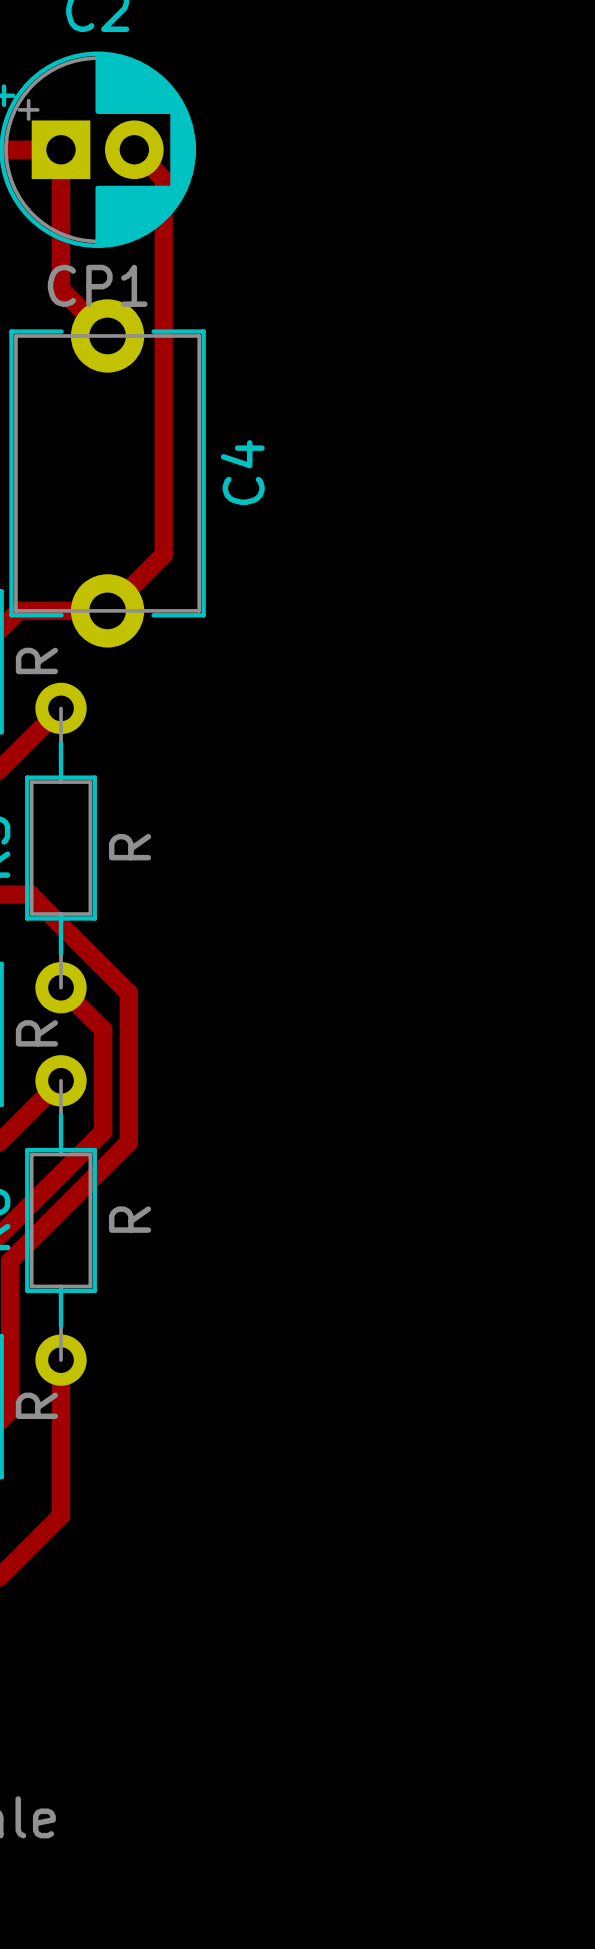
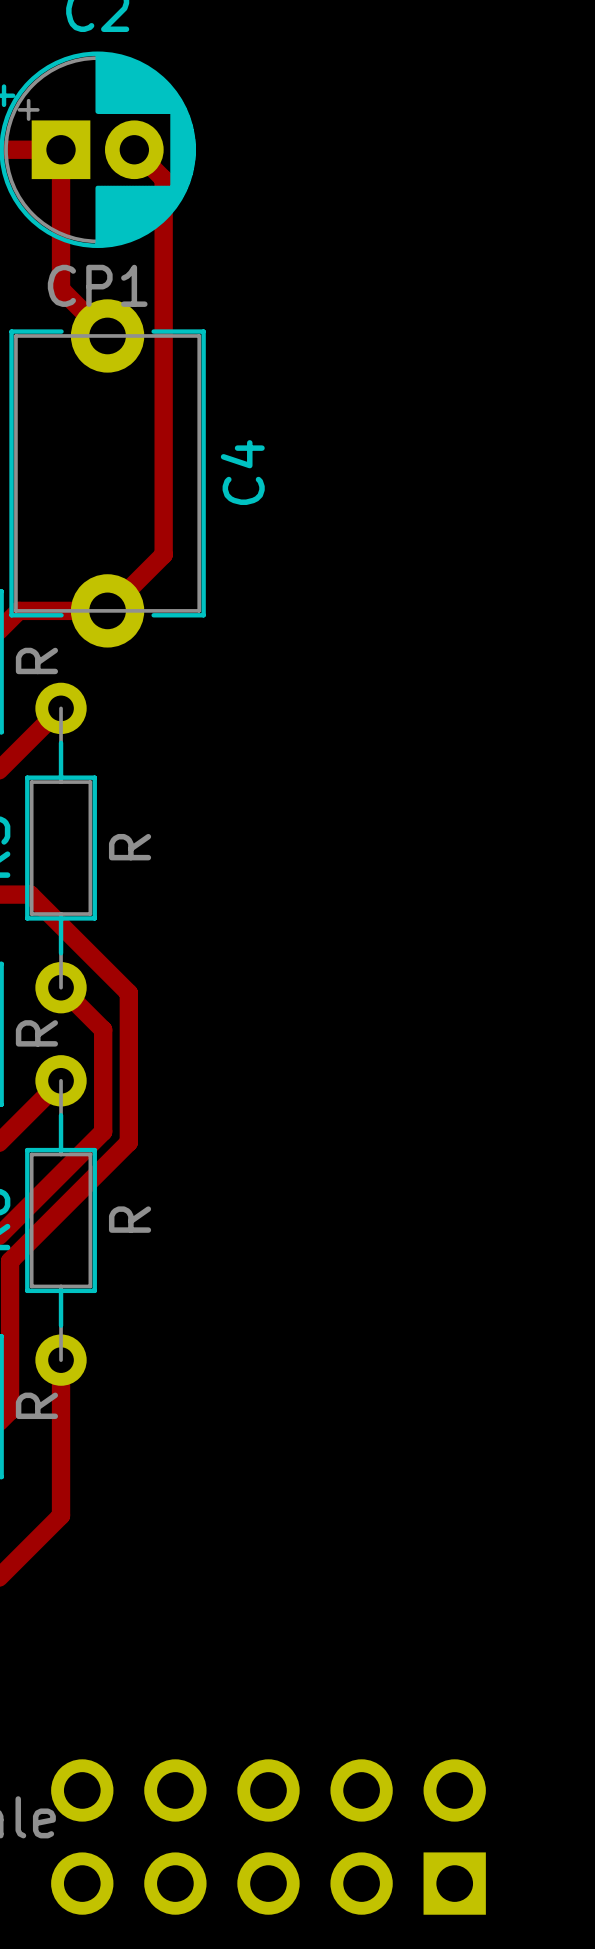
part: none -> (268, 1837)

